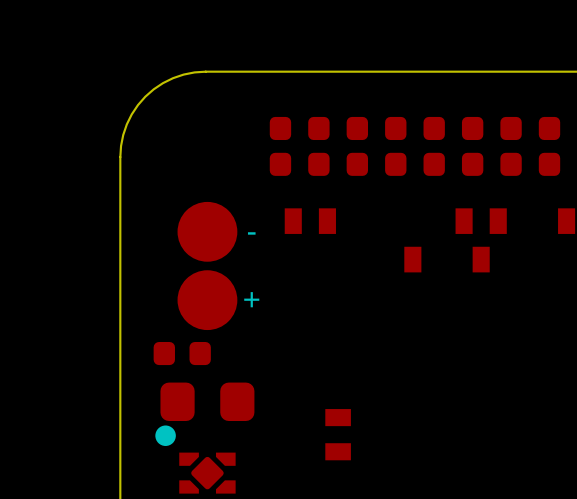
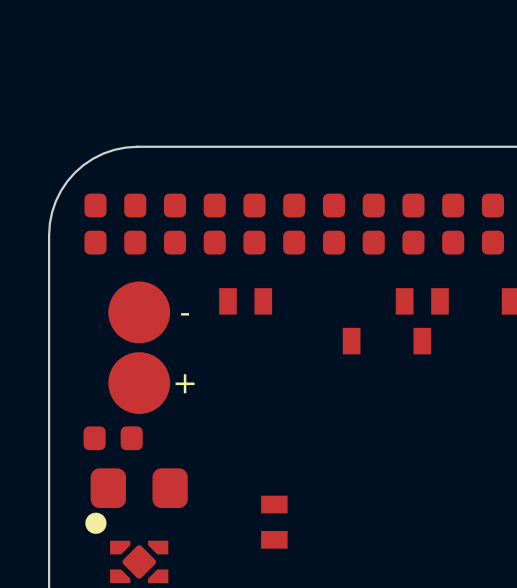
part: none -> (95, 224)
part: none -> (135, 224)
part: none -> (174, 224)

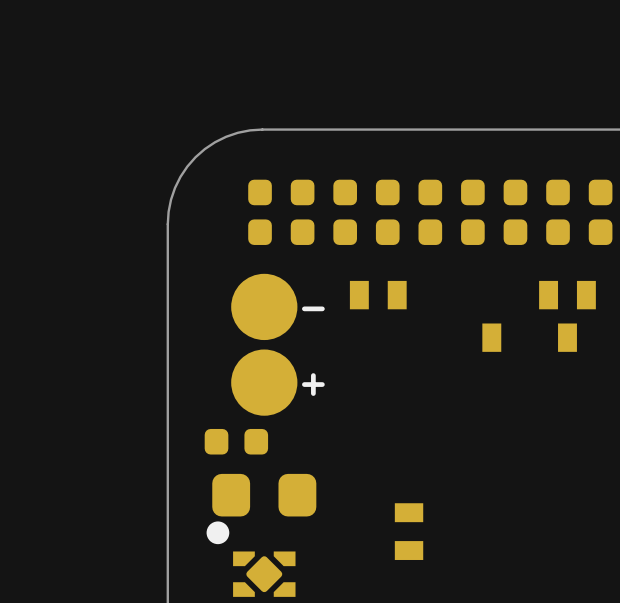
part: (95, 224) -> none

